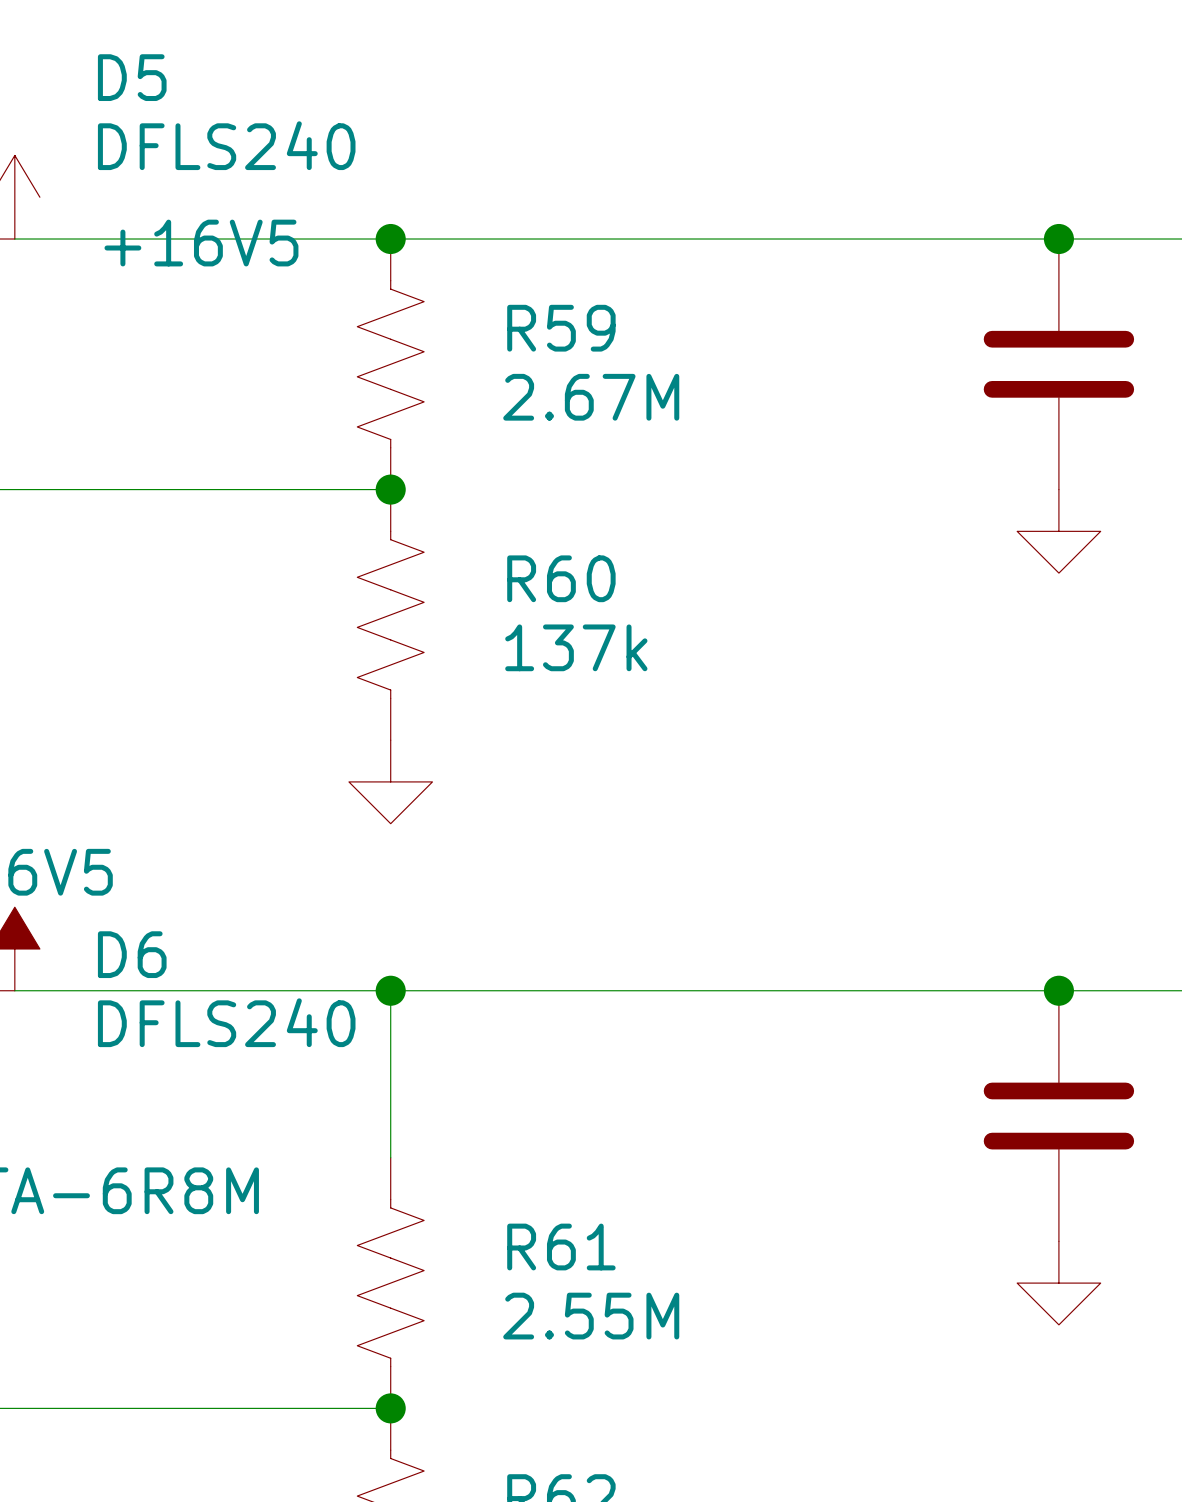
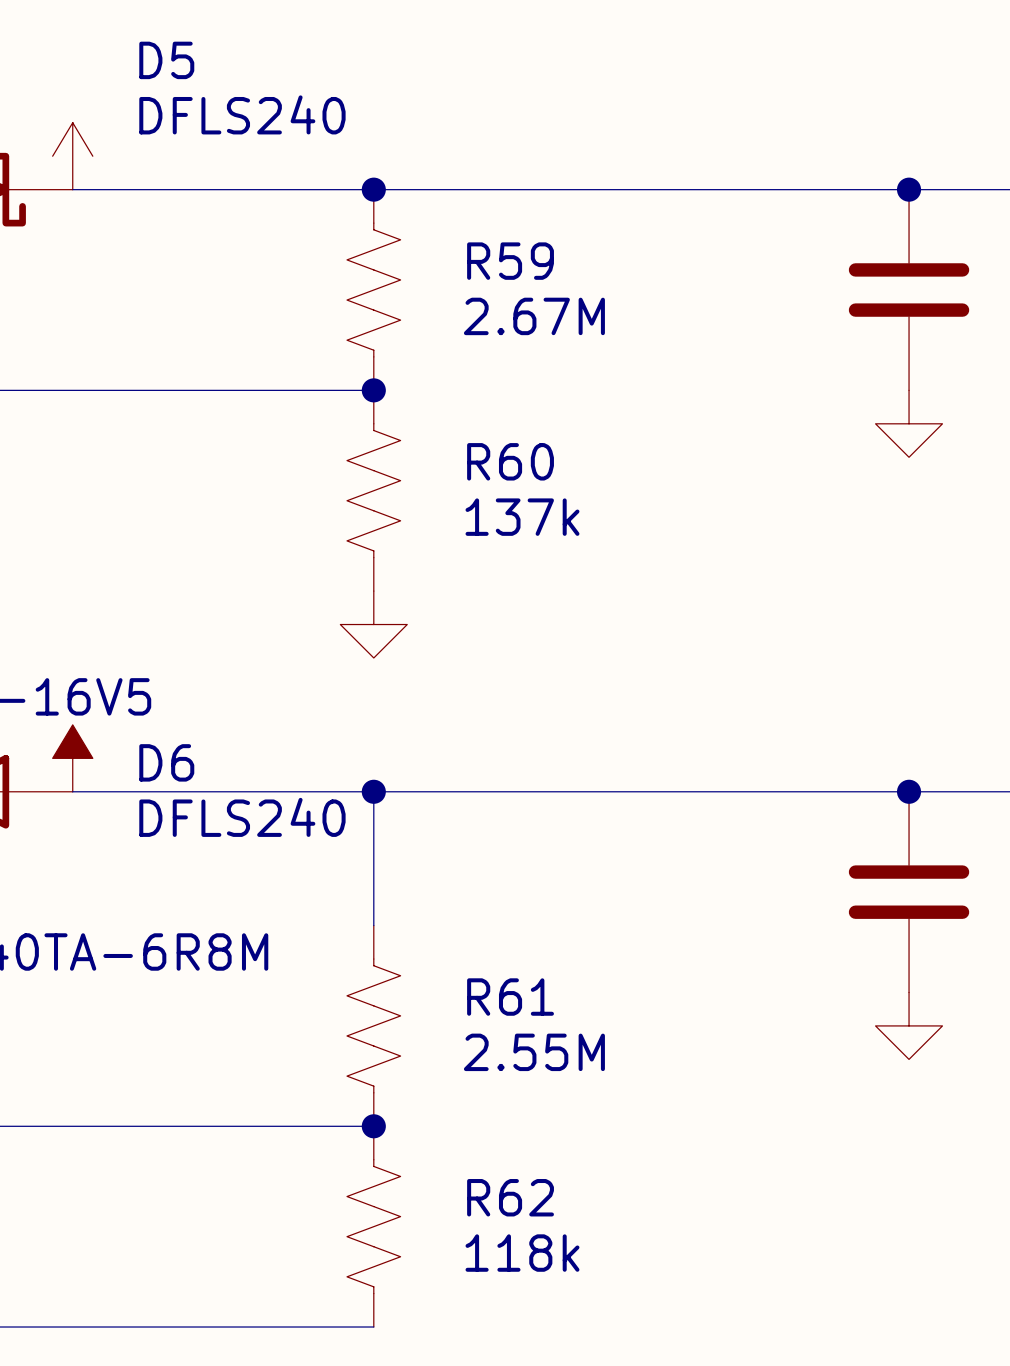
power symbol text: +16V5 (201, 243) -> none

